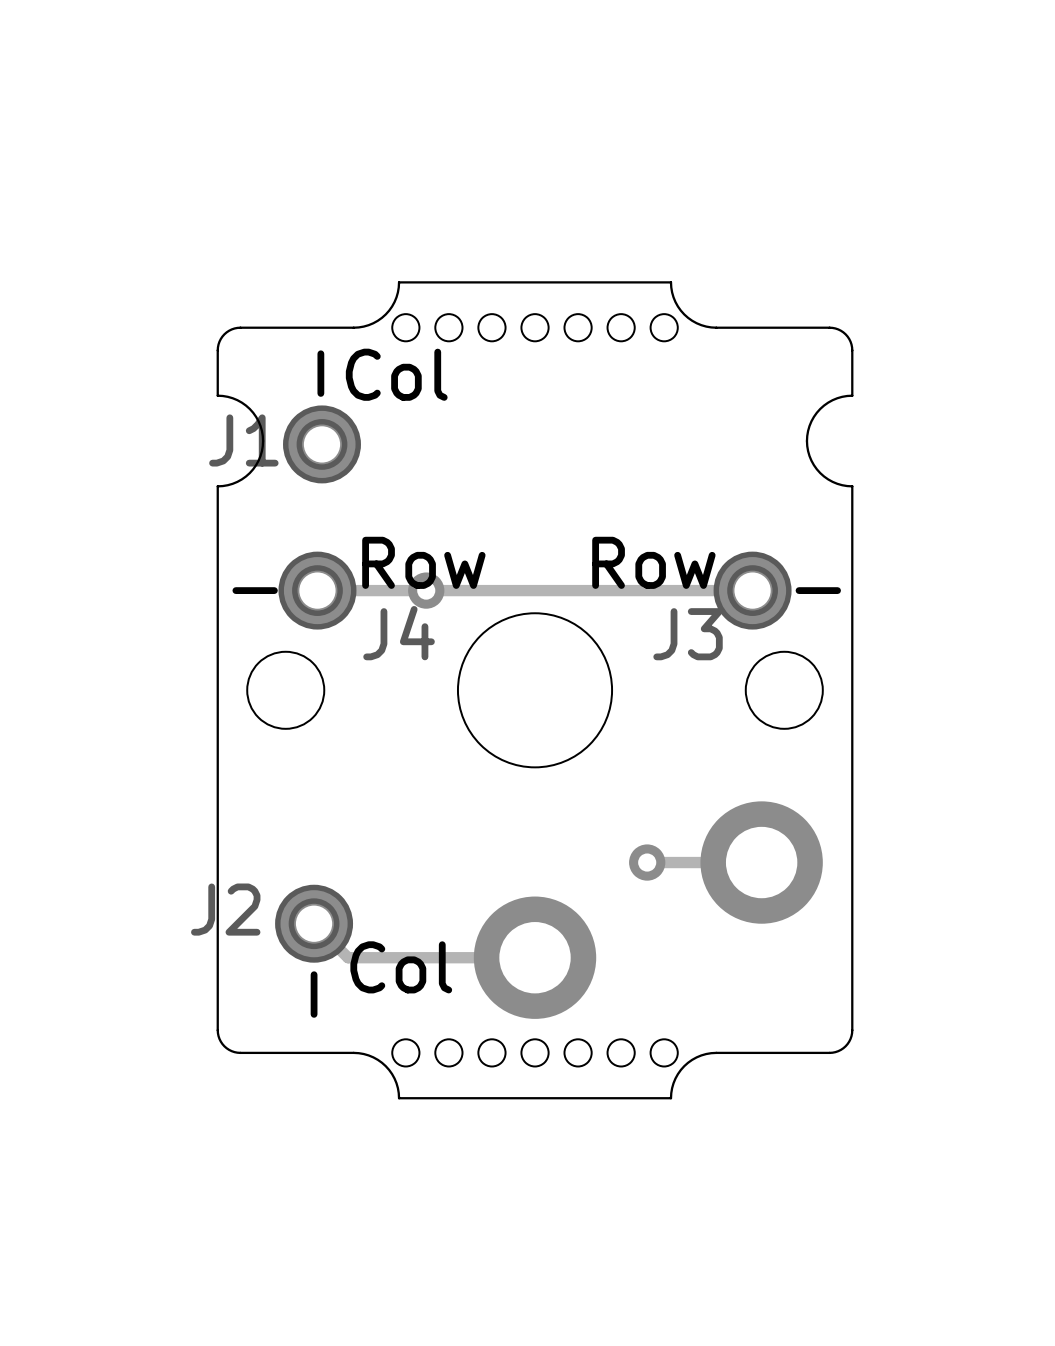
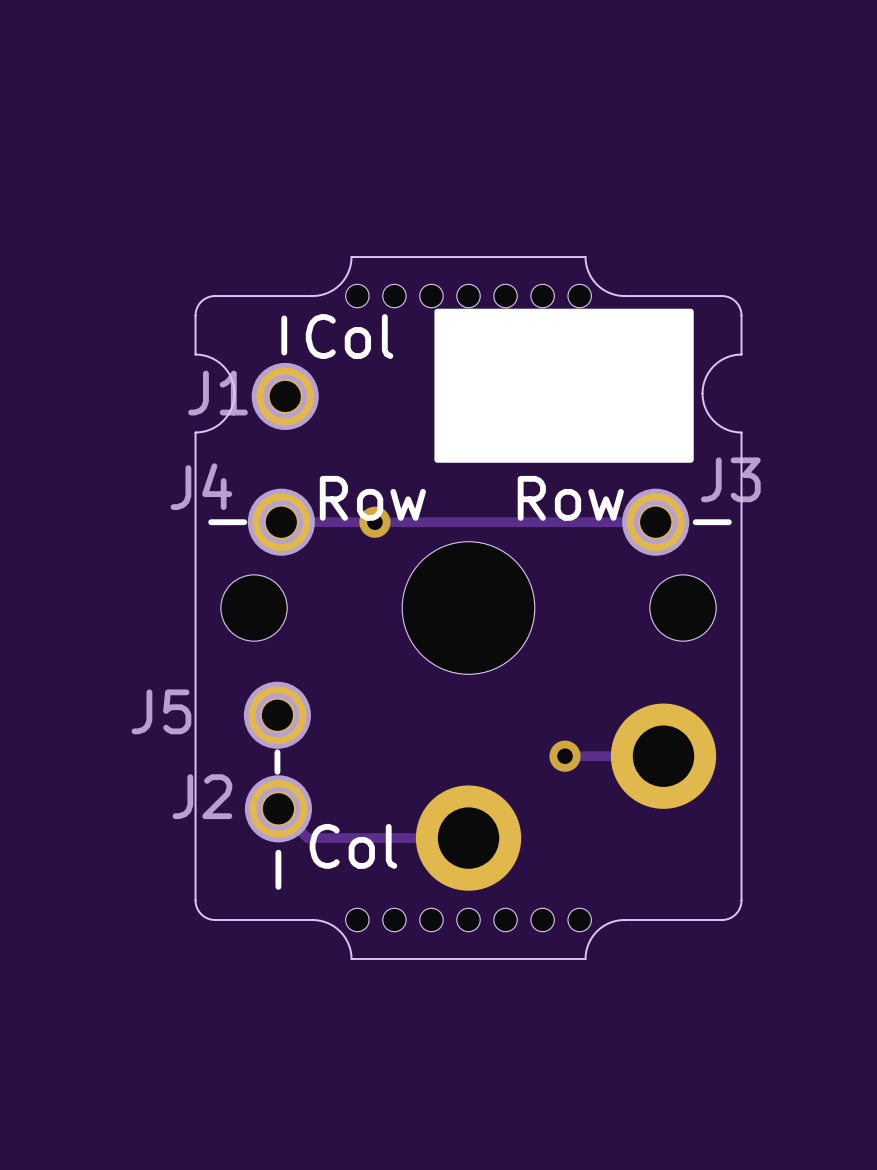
drawing: none -> [434, 308, 694, 463]
J4 name position: J4 (399, 633) -> J4 (201, 486)
J3 name position: J3 (688, 634) -> J3 (730, 479)
J5: none -> (277, 715)
line: none -> (277, 752) (277, 771)

